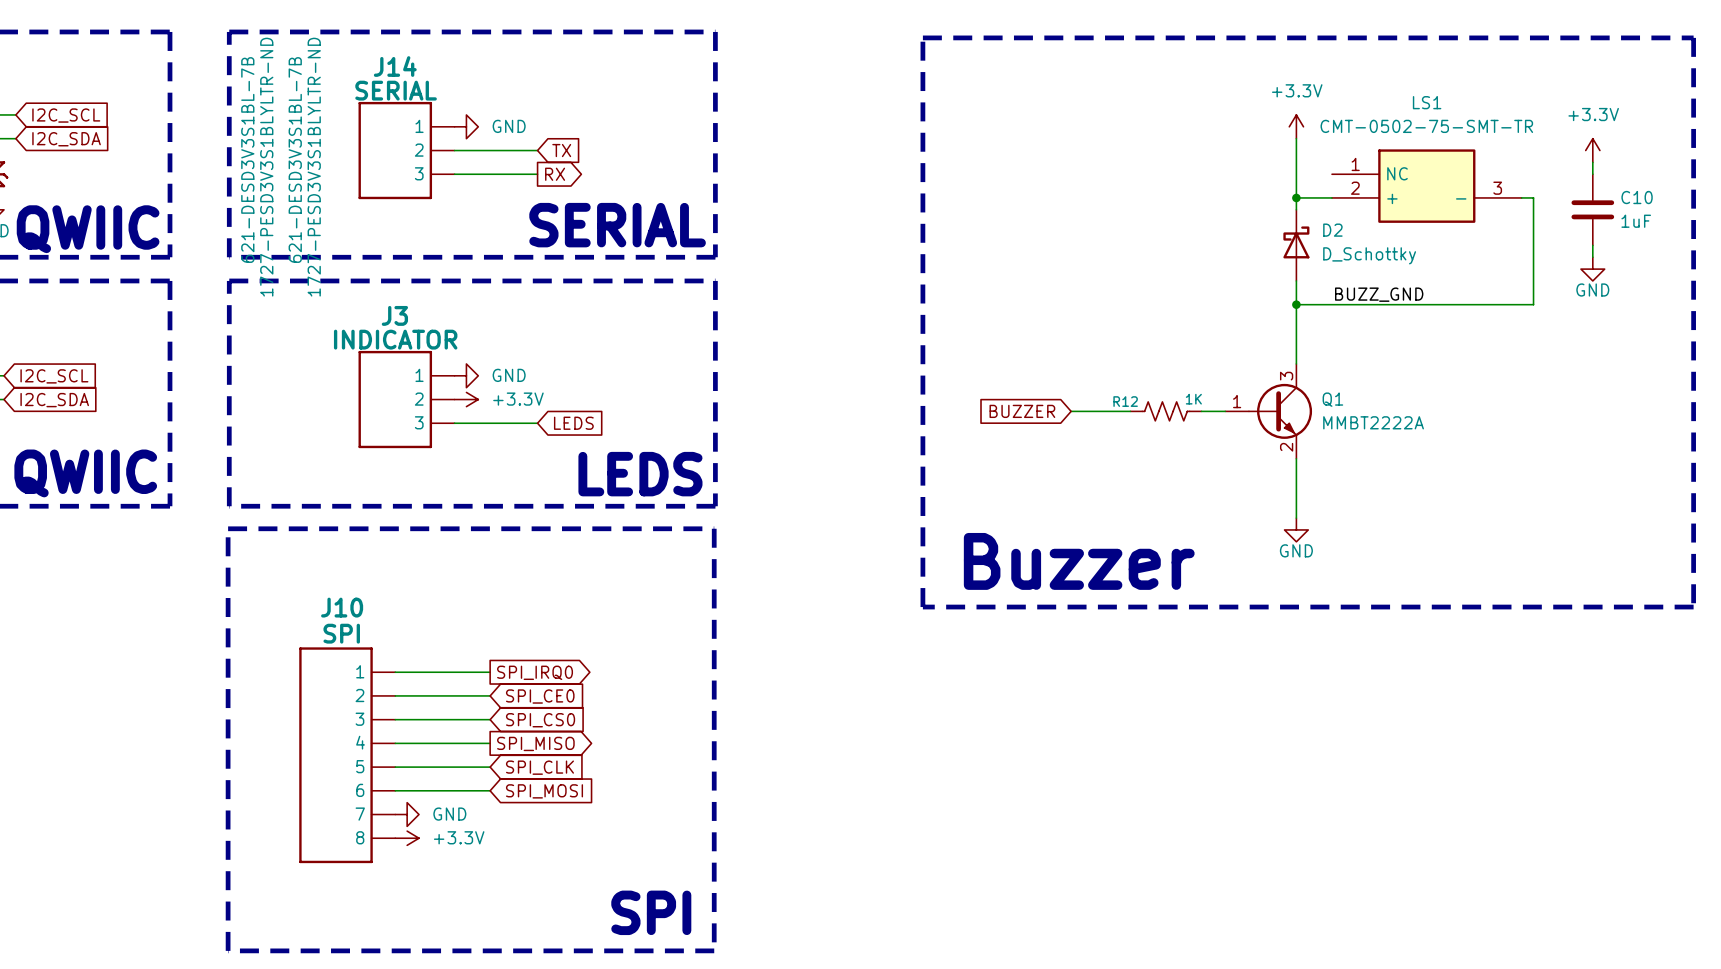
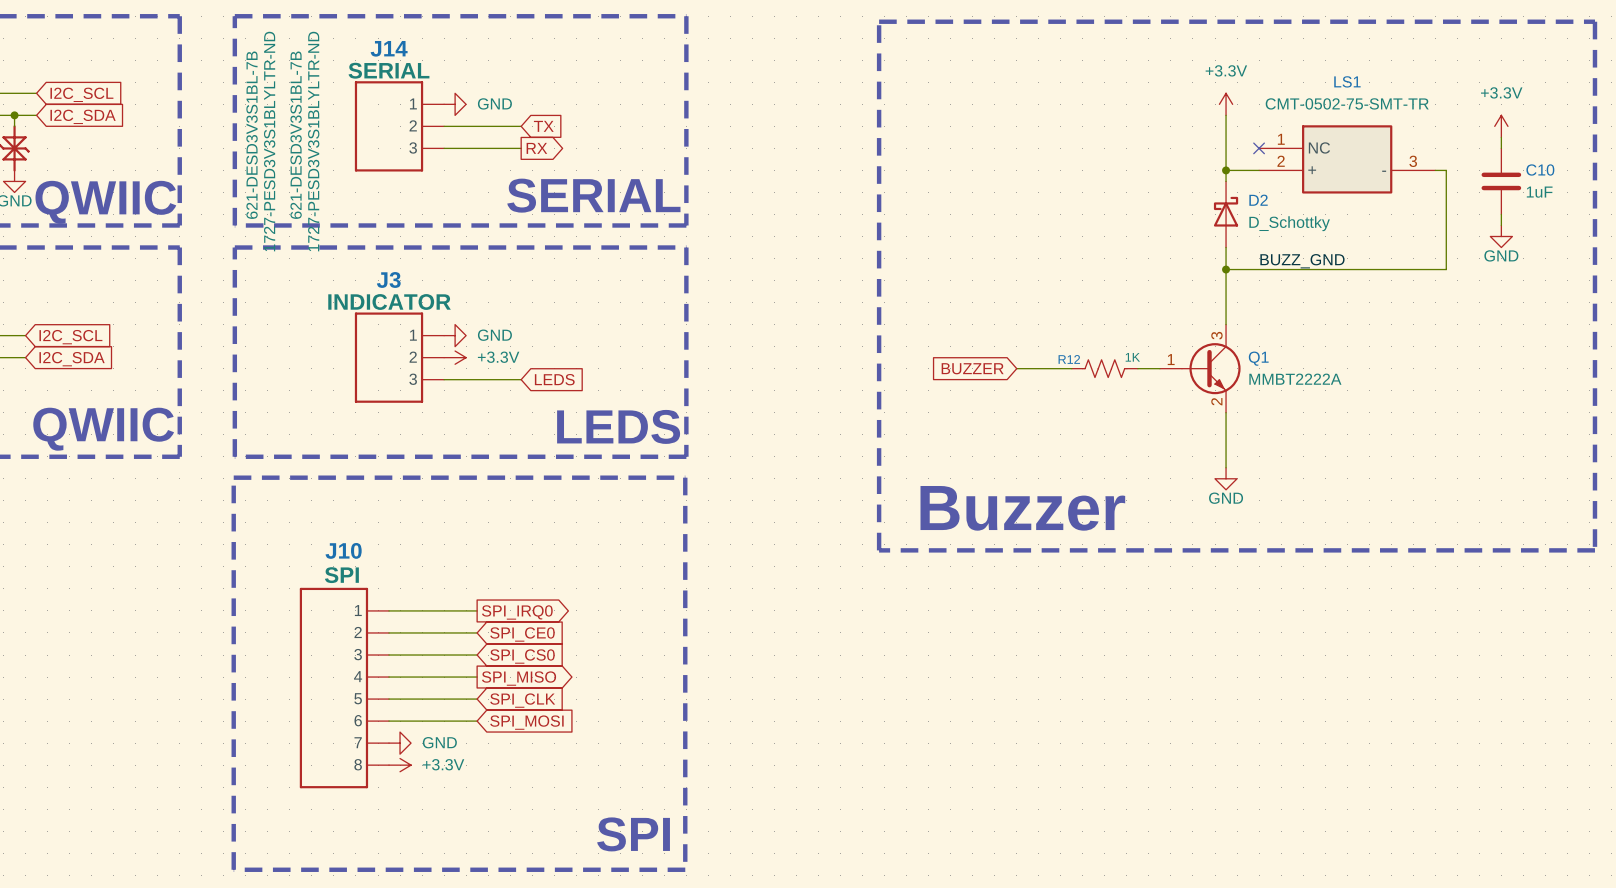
no-connect mark: none -> (1259, 148)

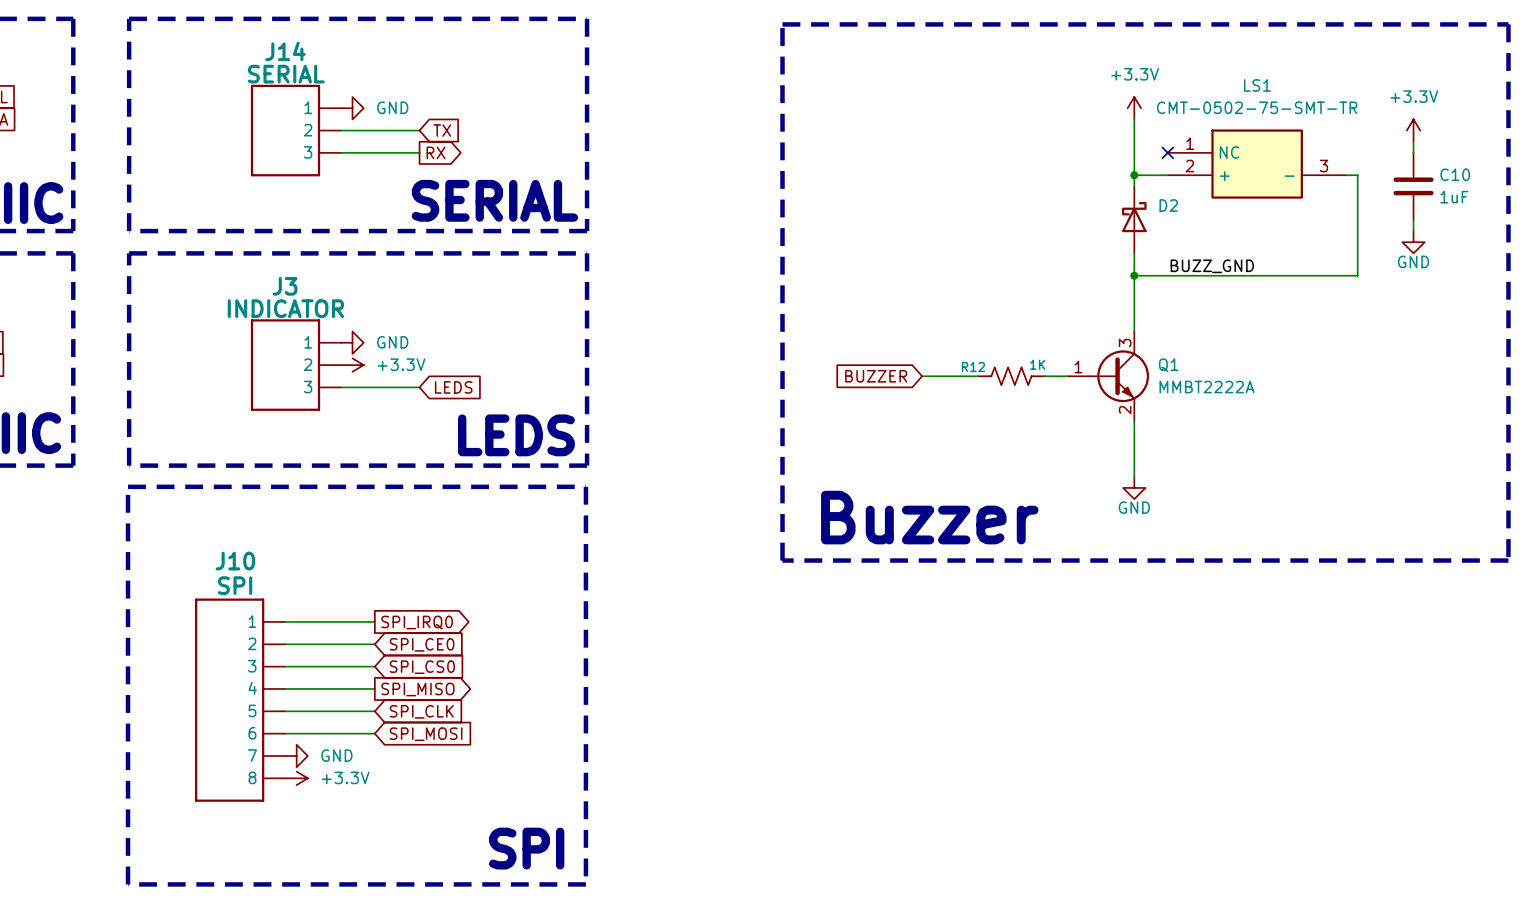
part text: 621-DESD3V3S1BL-7B (252, 135) -> none
part text: 621-DESD3V3S1BL-7B (296, 135) -> none
part text: 1727-PESD3V3S1BLYLTR-ND (269, 141) -> none
part text: 1727-PESD3V3S1BLYLTR-ND (313, 141) -> none
D2 value: D_Schottky (1289, 223) -> none

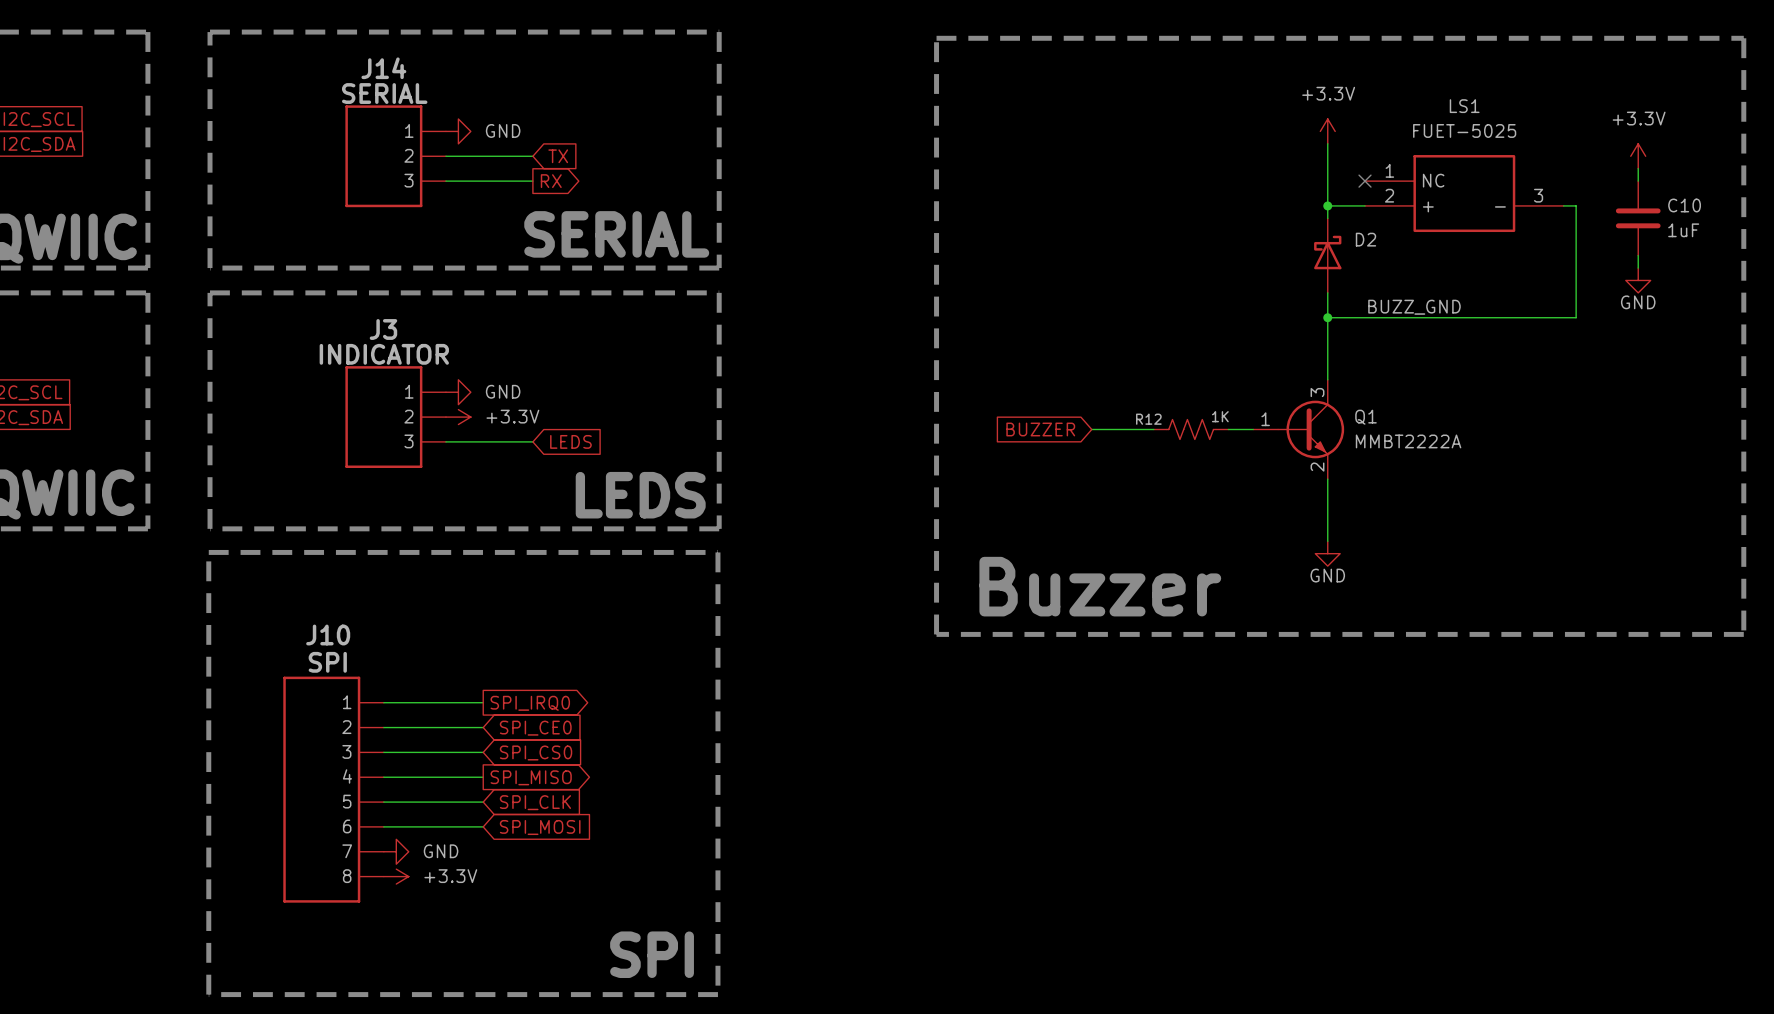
LS1 value: CMT-0502-75-SMT-TR (1257, 107) -> FUET-5025 (1464, 130)

